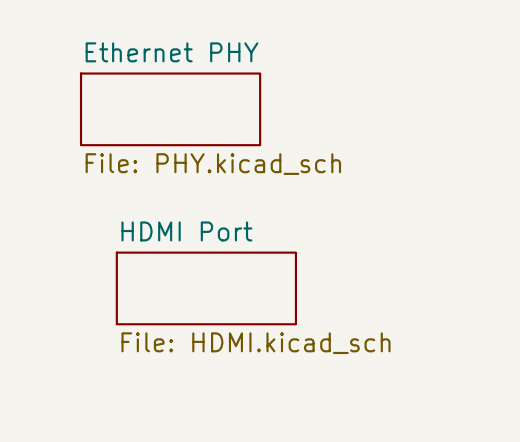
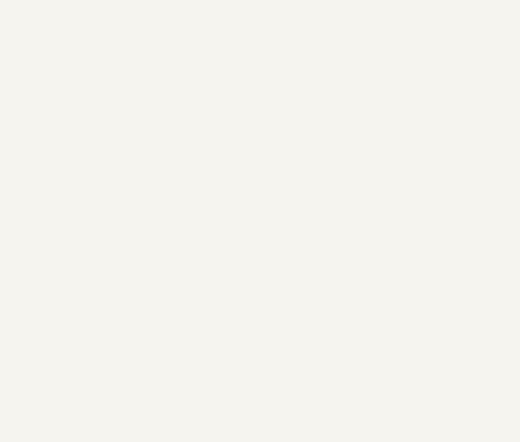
sheet Ethernet PHY: File: PHY.kicad_sch (170, 109) -> none
sheet HDMI Port: File: HDMI.kicad_sch (206, 288) -> none

